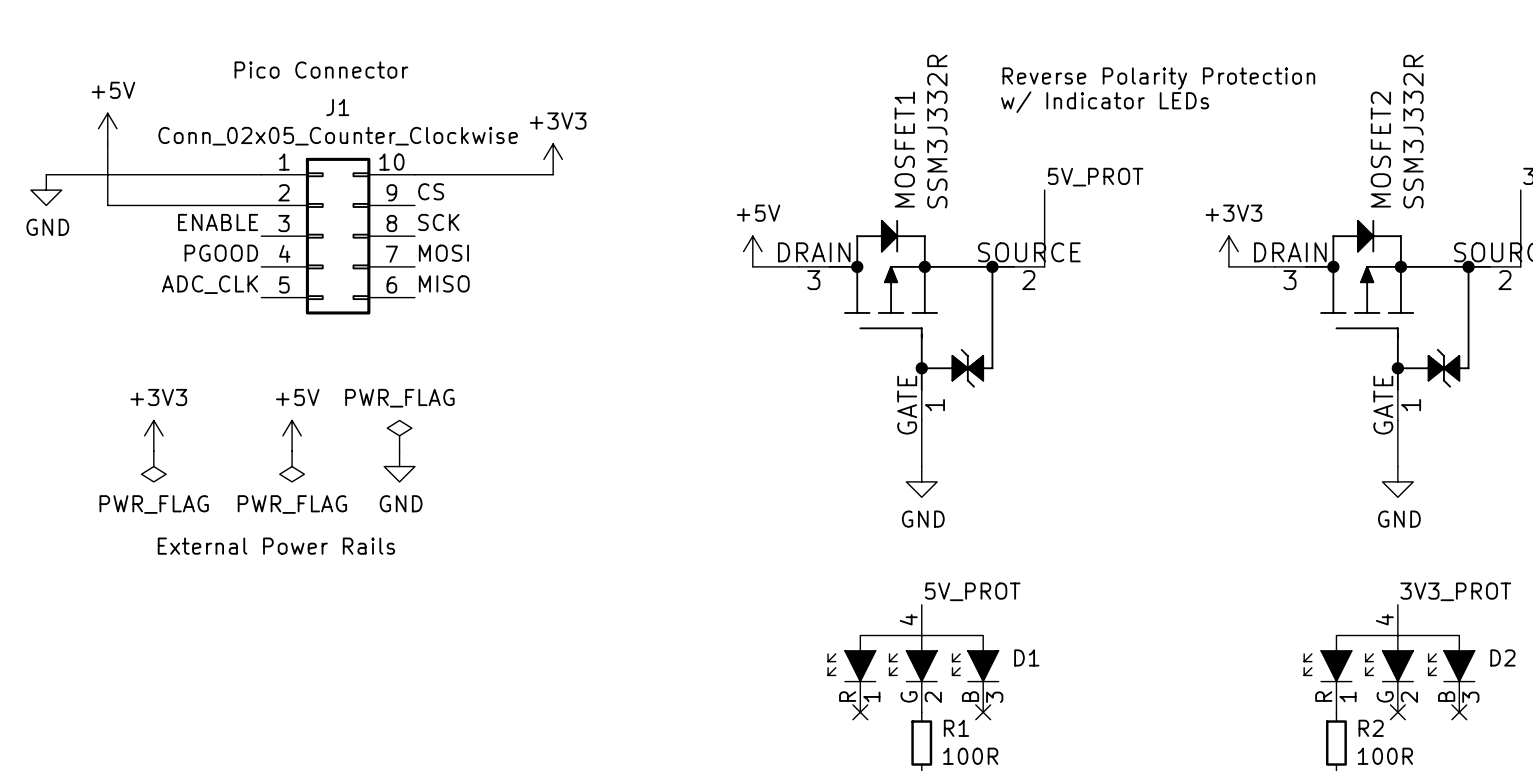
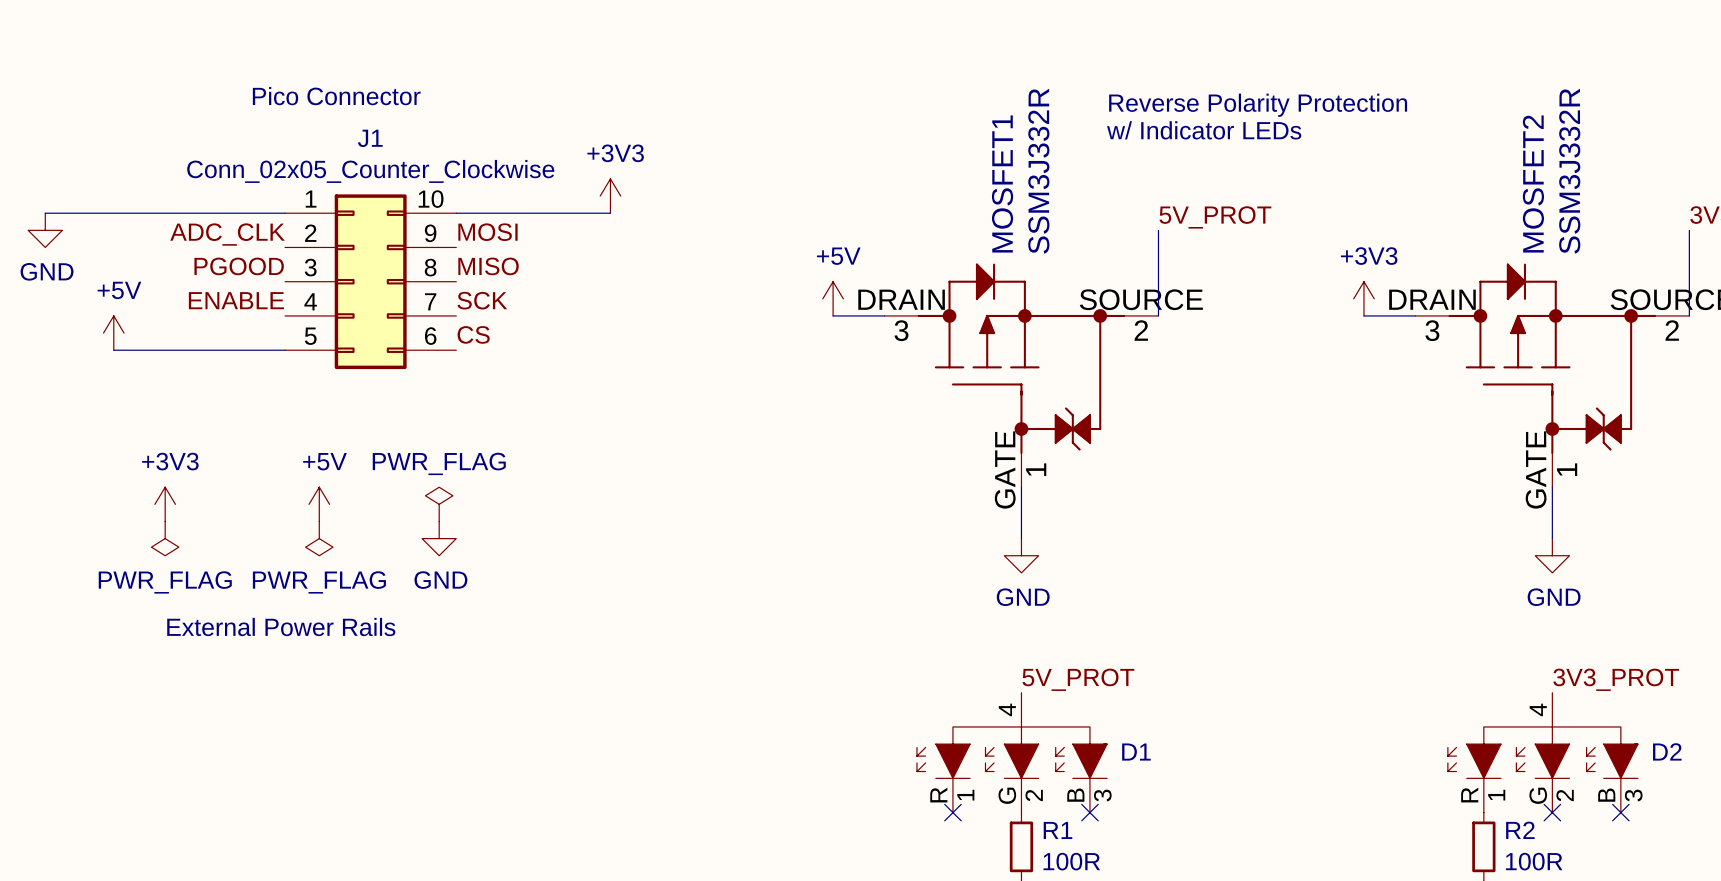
power symbol position: +5V (107, 128) -> +5V (113, 333)
wire: (107, 144) (107, 205) (261, 205) -> none
label: CS (431, 191) -> MOSI (487, 232)
label: ENABLE (218, 222) -> PGOOD (239, 266)
label: SCK (438, 222) -> MISO (488, 266)
label: PGOOD (221, 253) -> ENABLE (236, 300)
label: MOSI (443, 253) -> SCK (482, 300)
label: MISO (444, 283) -> CS (473, 334)
label position: ADC_CLK (210, 284) -> ADC_CLK (227, 234)
wire: none -> (113, 350) (285, 350)

